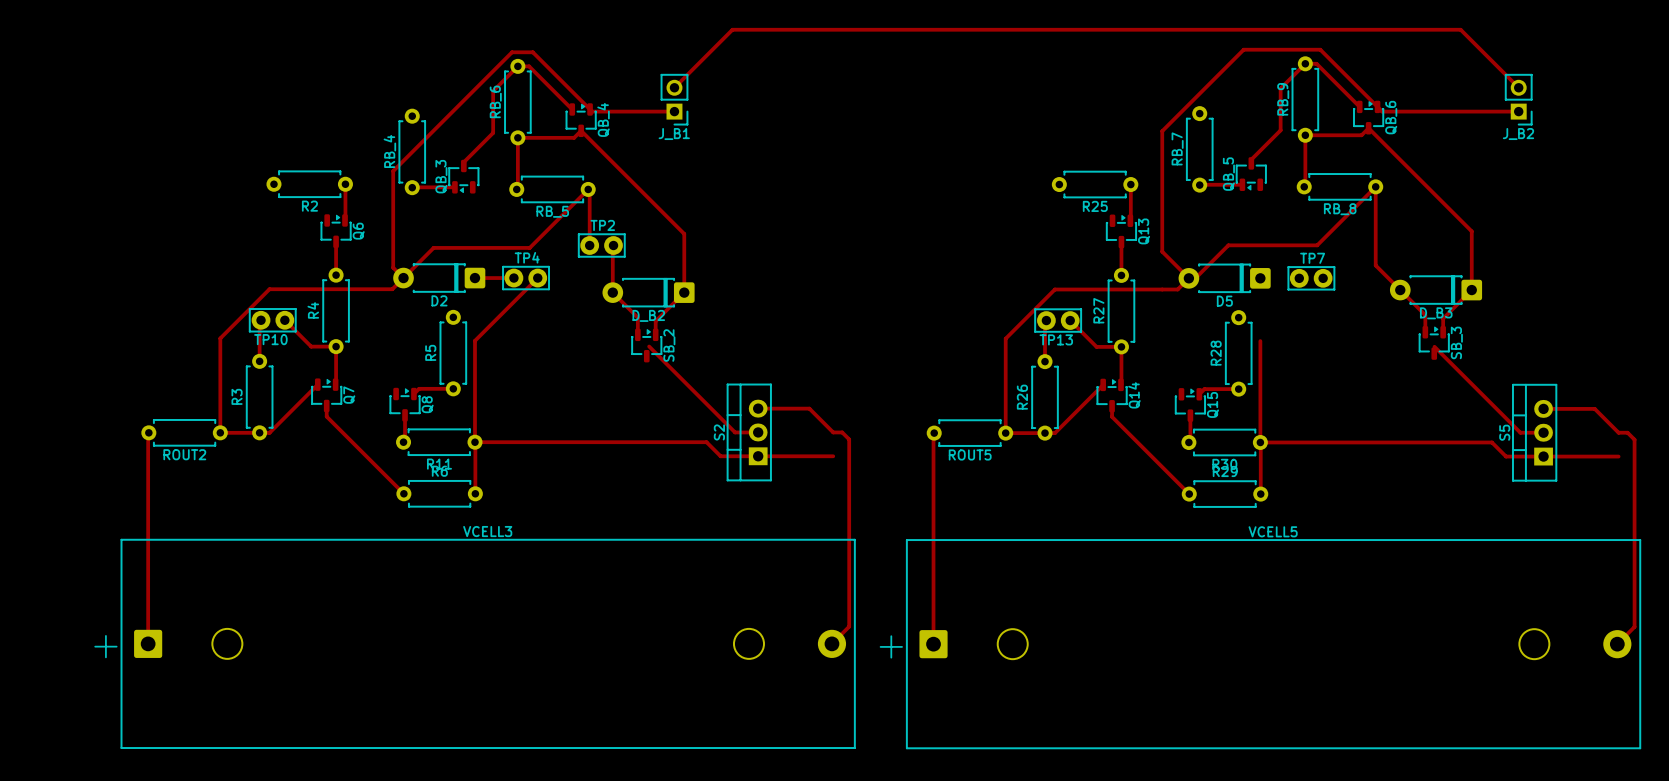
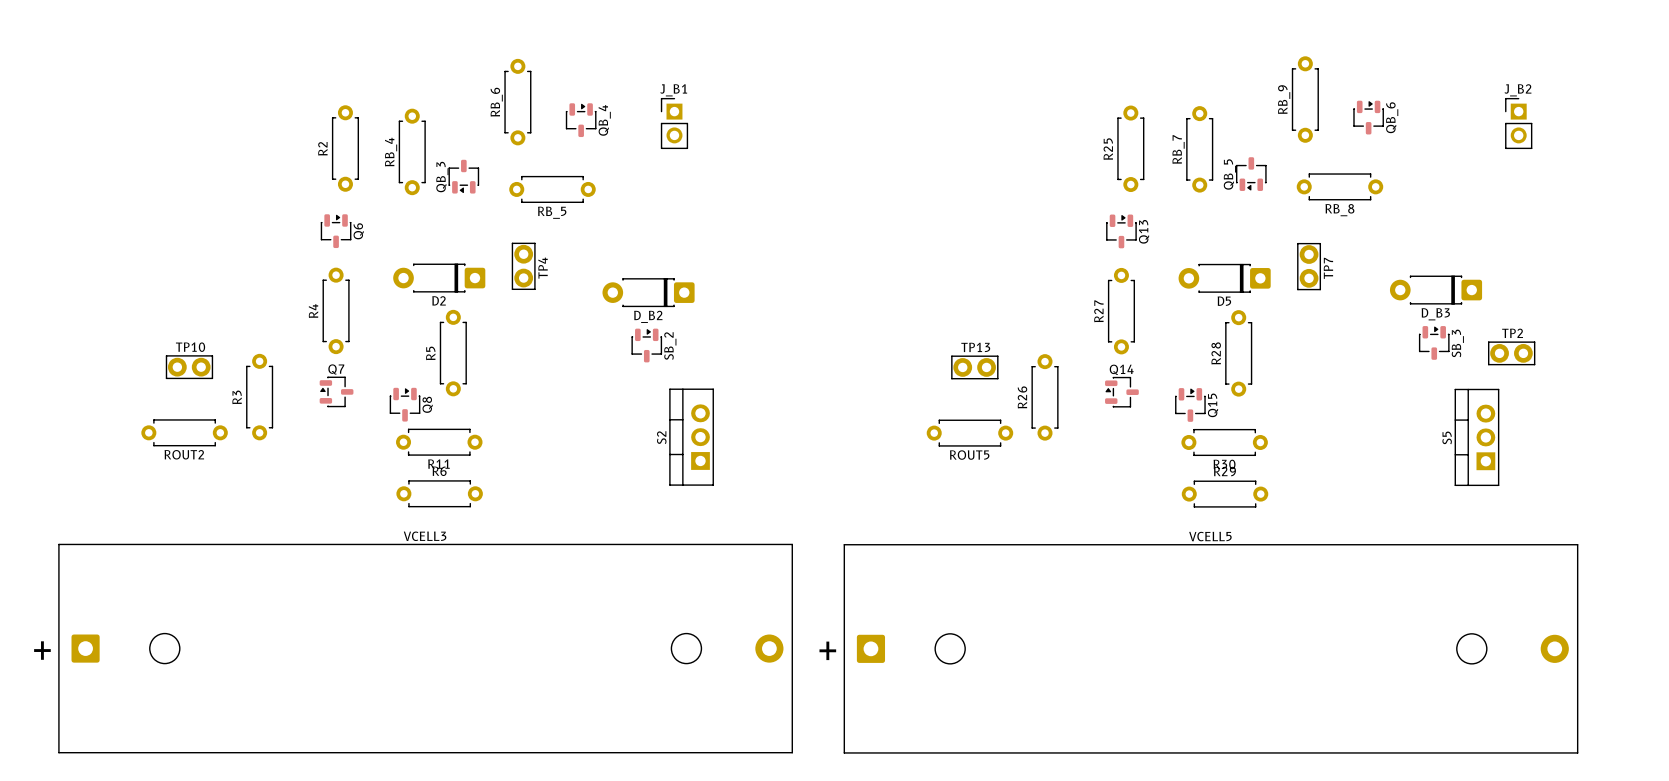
track: (674, 87) (732, 29) (1460, 29) (1518, 87) -> none
J_B1 rotation: 0° (674, 99) -> 180° (674, 123)
J_B2 rotation: 0° (1518, 99) -> 180° (1518, 123)
track: (1359, 106) (1316, 63) (1305, 63) (1280, 88) (1280, 130) (1251, 159) (1251, 163) -> none
track: (572, 109) (529, 66) (517, 66) (493, 91) (493, 132) (463, 162) (463, 165) -> none
track: (674, 111) (592, 111) (532, 52) (512, 52) (393, 171) (393, 267) (403, 278) -> none
track: (1518, 111) (1382, 111) (1320, 49) (1243, 49) (1162, 131) (1162, 251) (1188, 278) (1177, 289) (1054, 289) (1005, 338) (1005, 433) (1054, 433) (1103, 384) -> none
R2 rotation: 0° (309, 184) -> 90° clockwise (345, 148)
track: (345, 184) (344, 220) -> none
R25 rotation: 0° (1095, 184) -> 90° clockwise (1130, 148)
track: (1130, 184) (1130, 220) -> none
track: (1242, 184) (1199, 185) -> none
track: (1304, 186) (1305, 135) (1361, 135) (1368, 128) (1471, 231) (1471, 290) (1443, 318) (1443, 332) -> none
track: (1375, 186) (1317, 245) (1228, 245) (1188, 285) -> none
track: (1375, 186) (1375, 265) (1425, 315) (1425, 332) -> none
track: (454, 187) (412, 187) -> none
track: (516, 189) (517, 137) (574, 137) (581, 130) (684, 233) (684, 292) (655, 321) (655, 334) -> none
track: (336, 241) (336, 275) -> none
track: (1121, 242) (1121, 275) -> none
track: (589, 245) (588, 189) (529, 247) (433, 247) (392, 289) (269, 289) (220, 338) (220, 432) (269, 432) (317, 384) -> none
TP2 position: (601, 245) -> (1511, 353)
track: (613, 245) (612, 292) (637, 317) (637, 334) -> none
track: (475, 278) (513, 278) -> none
TP4 rotation: 0° (526, 278) -> 90° clockwise (523, 266)
track: (537, 278) (475, 340) (475, 442) -> none
TP7 rotation: 0° (1311, 278) -> 90° clockwise (1309, 266)
track: (261, 320) (259, 361) (262, 361) -> none
TP10 rotation: 0° (272, 320) -> 180° (189, 367)
TP10 position: (272, 320) -> (189, 367)
track: (284, 320) (311, 346) (336, 346) (335, 384) -> none
track: (1046, 320) (1045, 361) (1047, 361) -> none
TP13 rotation: 0° (1058, 320) -> 180° (974, 367)
TP13 position: (1058, 320) -> (974, 367)
track: (1070, 320) (1096, 346) (1121, 346) (1120, 384) -> none
track: (1260, 341) (1260, 442) -> none
track: (649, 346) (735, 432) (758, 432) -> none
track: (1434, 346) (1520, 432) (1543, 432) -> none
track: (453, 388) (419, 388) (413, 394) -> none
track: (1238, 389) (1204, 389) (1199, 394) -> none
Q7 rotation: 0° (326, 395) -> 90° counterclockwise (336, 391)
Q14 rotation: 0° (1112, 395) -> 90° counterclockwise (1121, 392)
track: (326, 405) (326, 416) (403, 493) -> none
track: (1112, 406) (1112, 416) (1189, 494) -> none
track: (758, 408) (809, 408) (833, 432) (842, 432) (849, 439) (849, 626) (831, 643) -> none
track: (1543, 408) (1594, 408) (1618, 432) (1627, 432) (1634, 439) (1634, 626) (1617, 644) -> none
track: (405, 415) (403, 442) -> none
track: (1190, 415) (1188, 442) -> none
track: (148, 432) (148, 643) -> none
S2 position: (749, 432) -> (691, 437)
S5 position: (1534, 432) -> (1476, 437)
track: (934, 433) (933, 644) -> none
track: (475, 442) (706, 442) (720, 456) (833, 456) -> none
track: (475, 442) (475, 493) -> none
track: (1260, 442) (1491, 442) (1506, 456) (1618, 456) -> none
track: (1260, 442) (1260, 494) -> none
VCELL3 position: (488, 643) -> (425, 648)
VCELL5 position: (1273, 644) -> (1210, 648)

